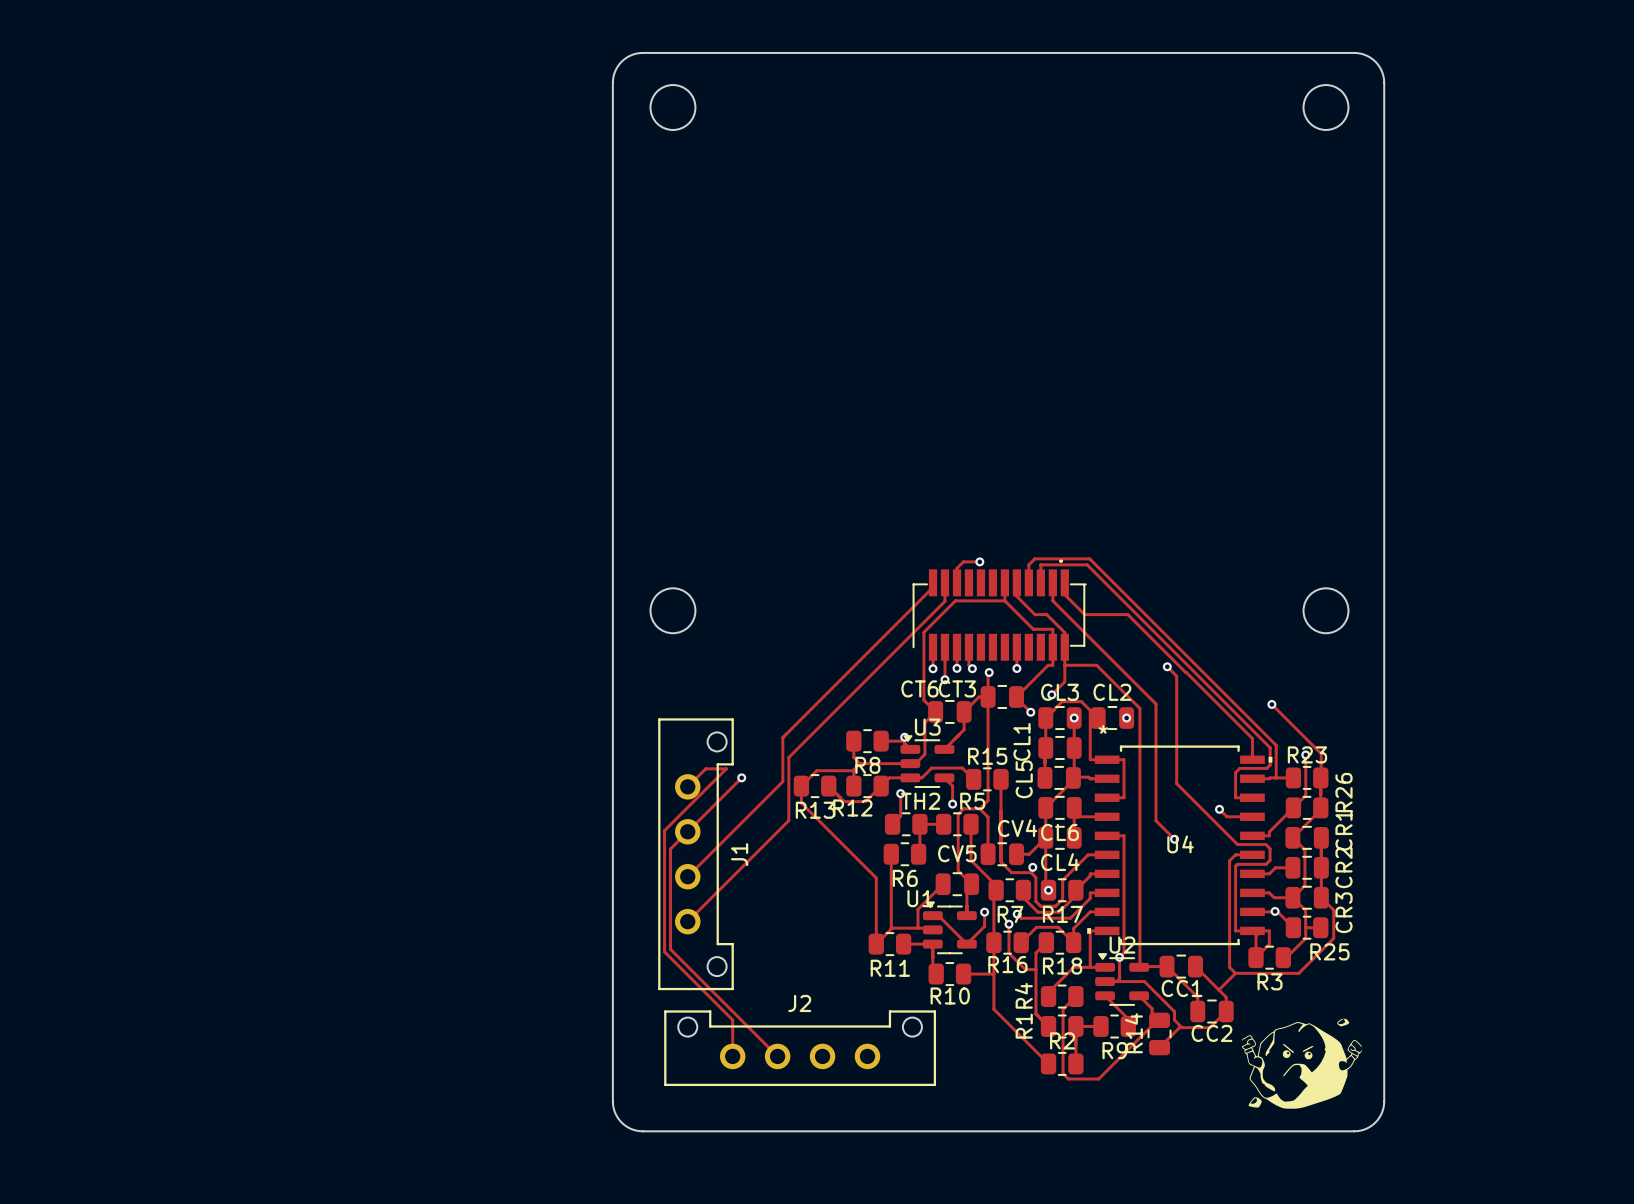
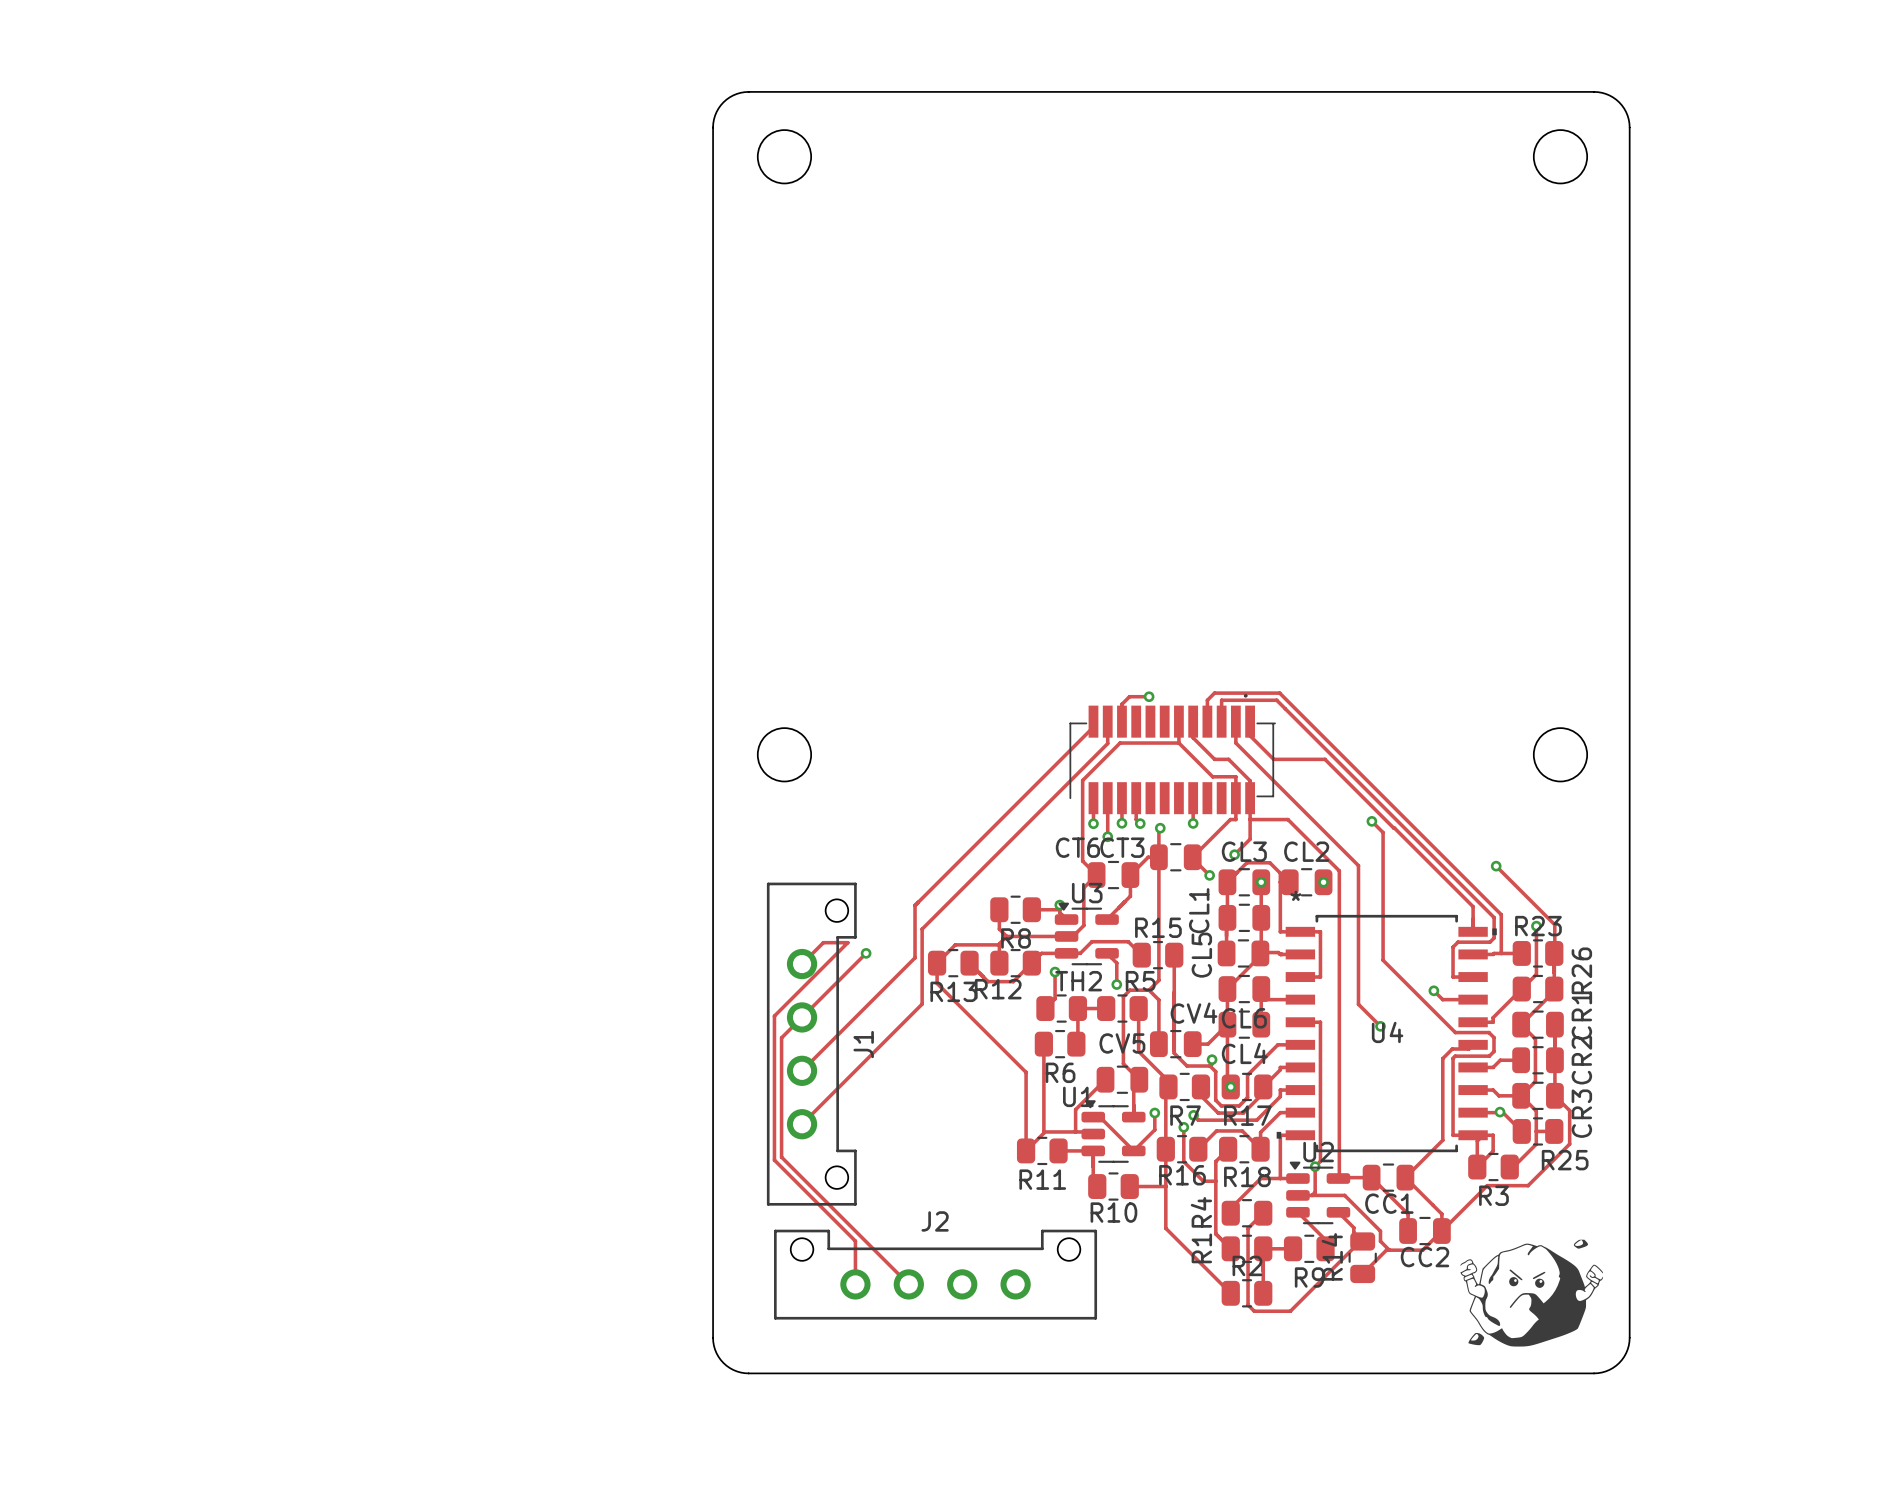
track: (1252, 854) (1235, 854) (1229, 860) (1229, 967) (1235, 973) -> (1473, 1044) (1468, 1049) (1452, 1049) (1442, 1058) (1442, 1140) (1405, 1177)
track: (1235, 973) (1264, 973) -> (1441, 1231) (1487, 1185)
track: (1235, 973) (1218, 990) -> none

